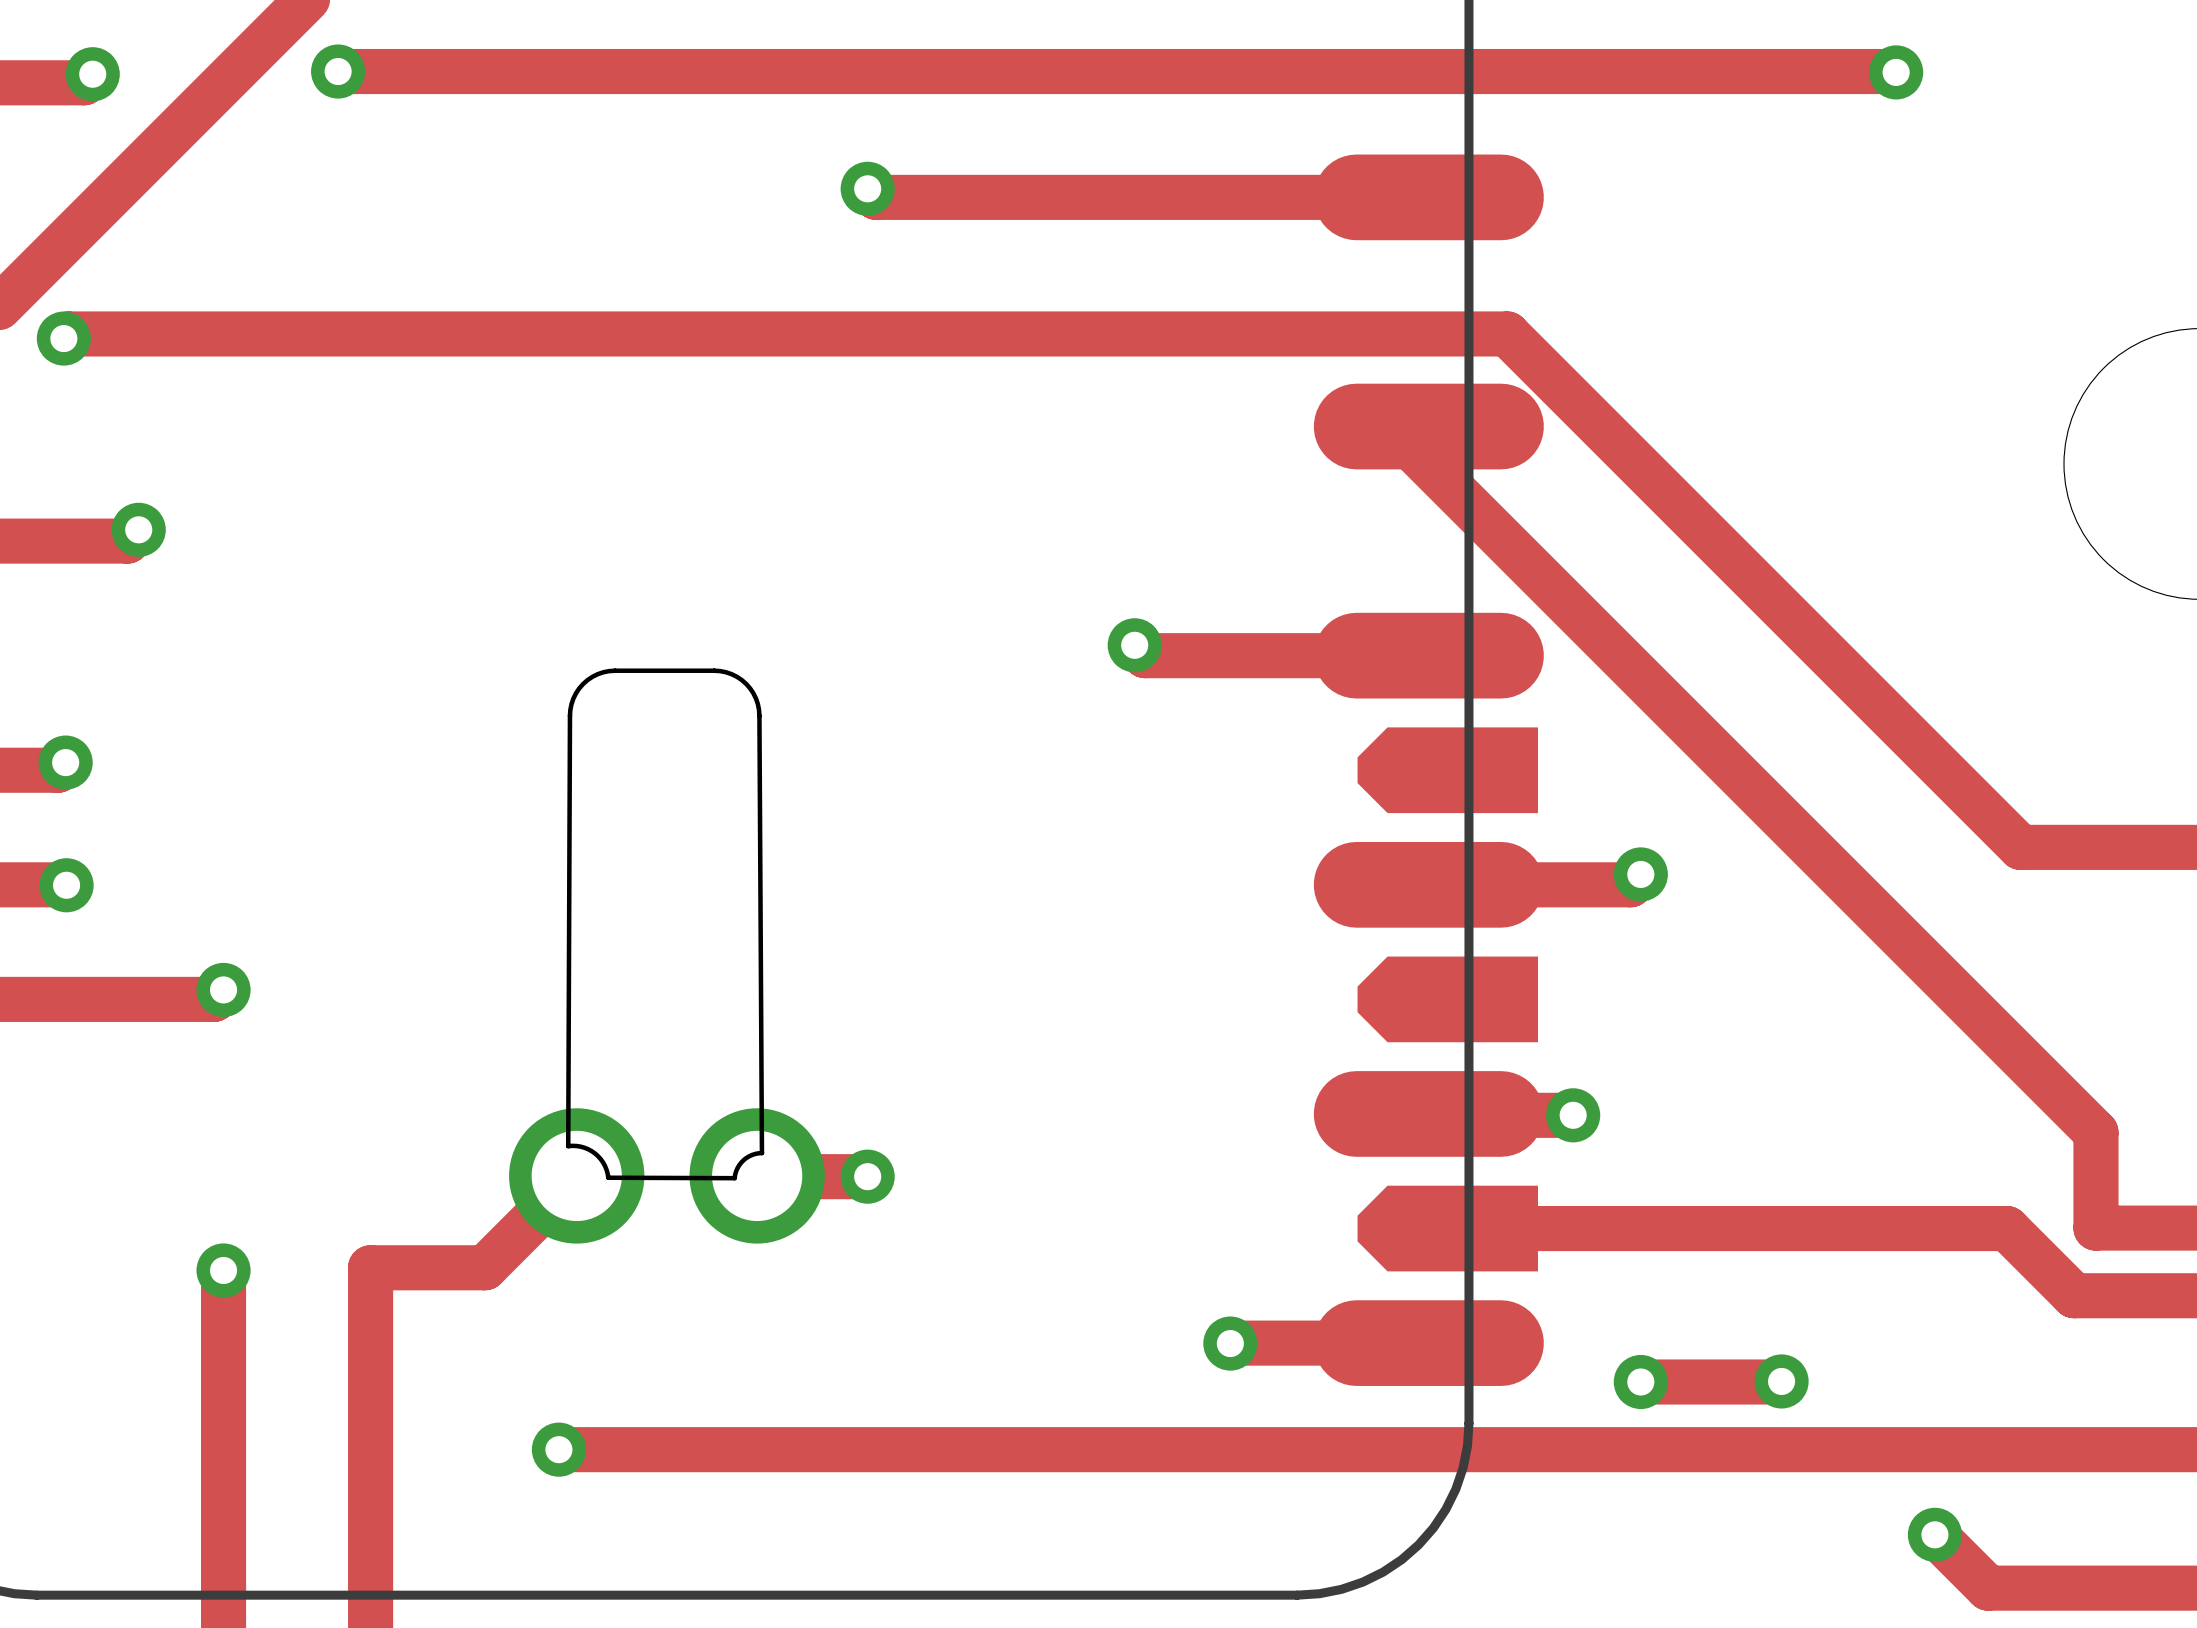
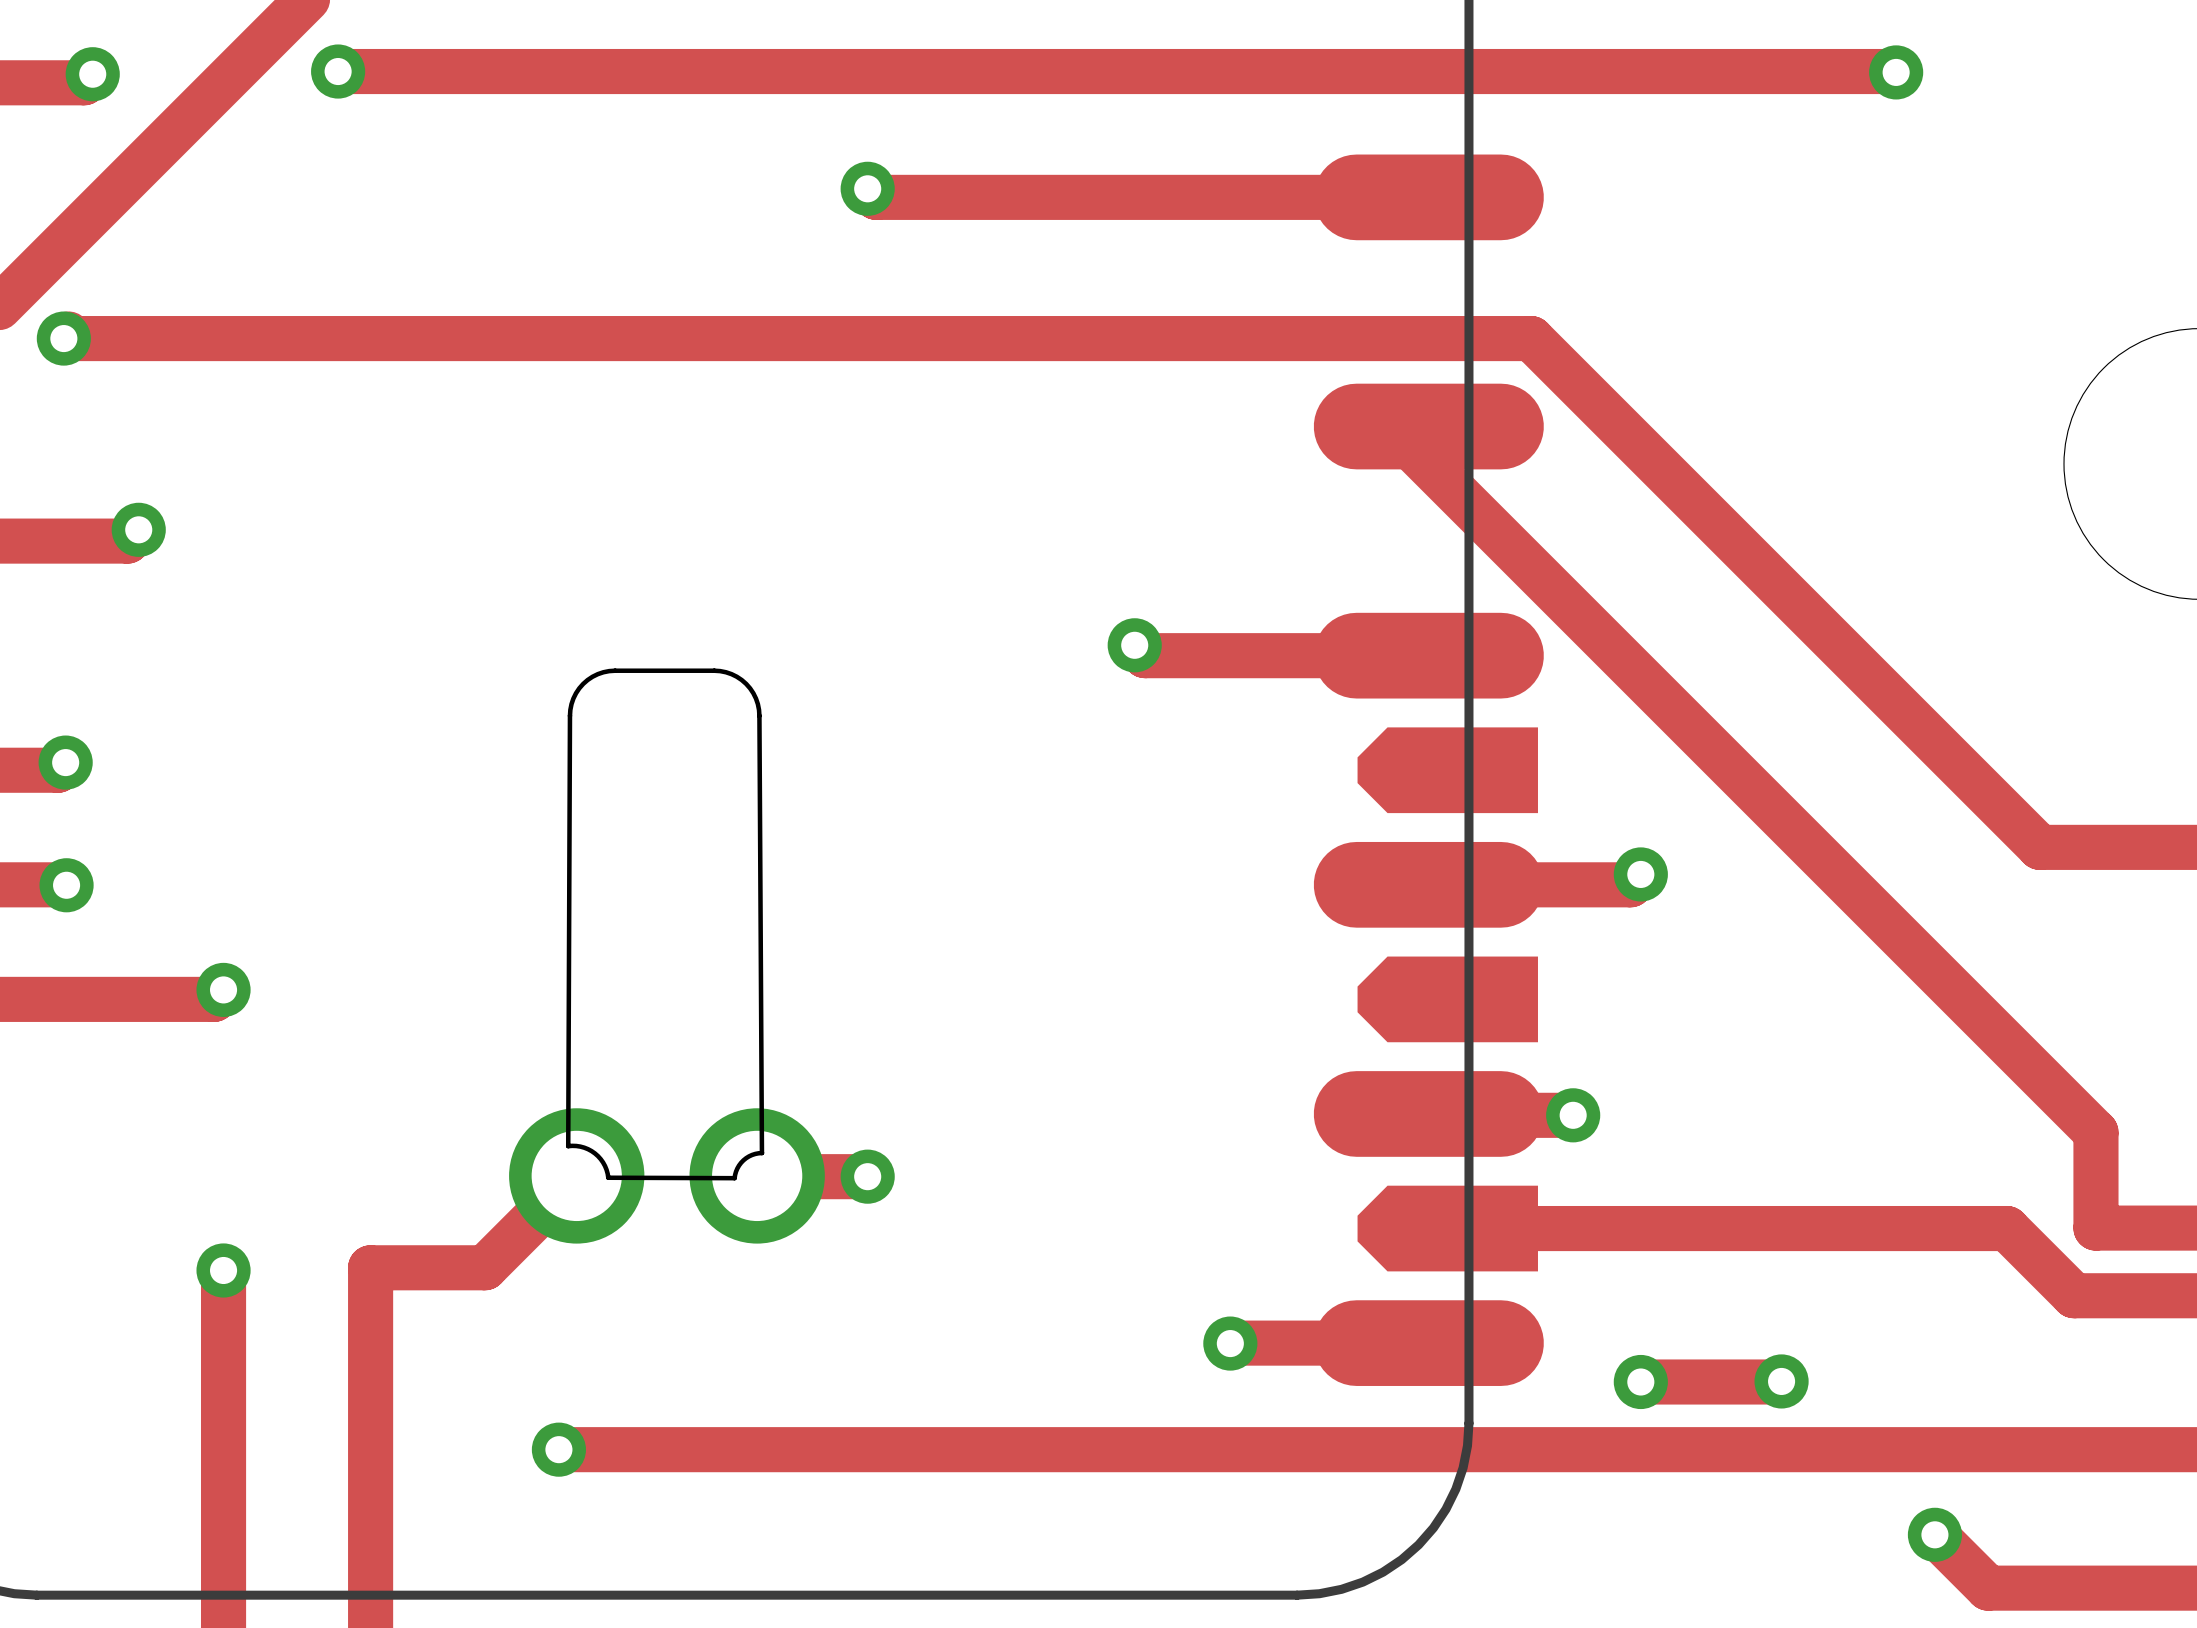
track: (68, 333) (1507, 333) (2020, 847) (2039, 847) -> (63, 338) (1531, 338) (2039, 847)

